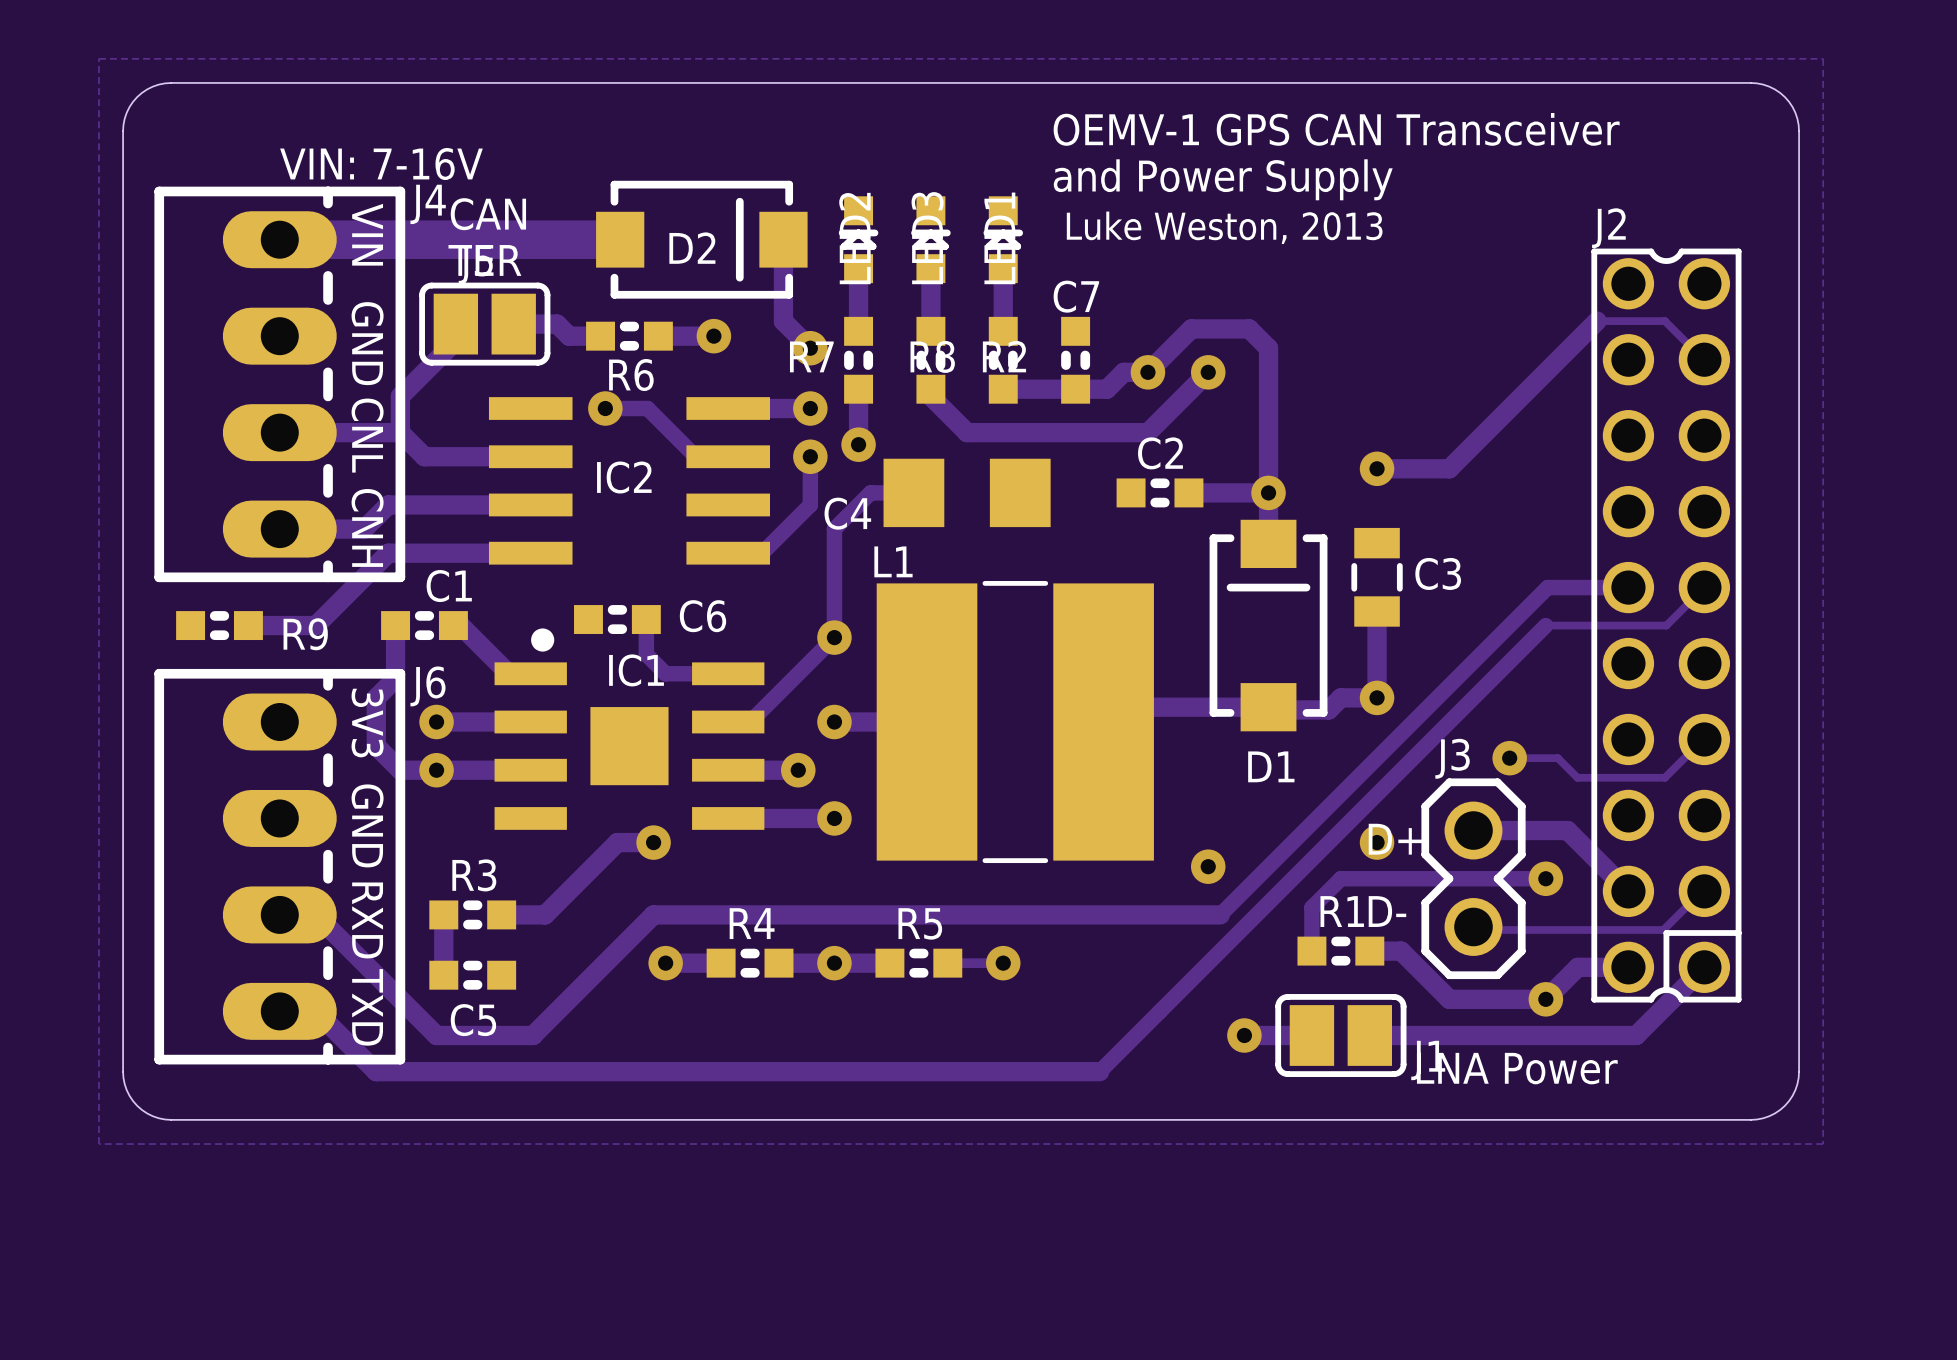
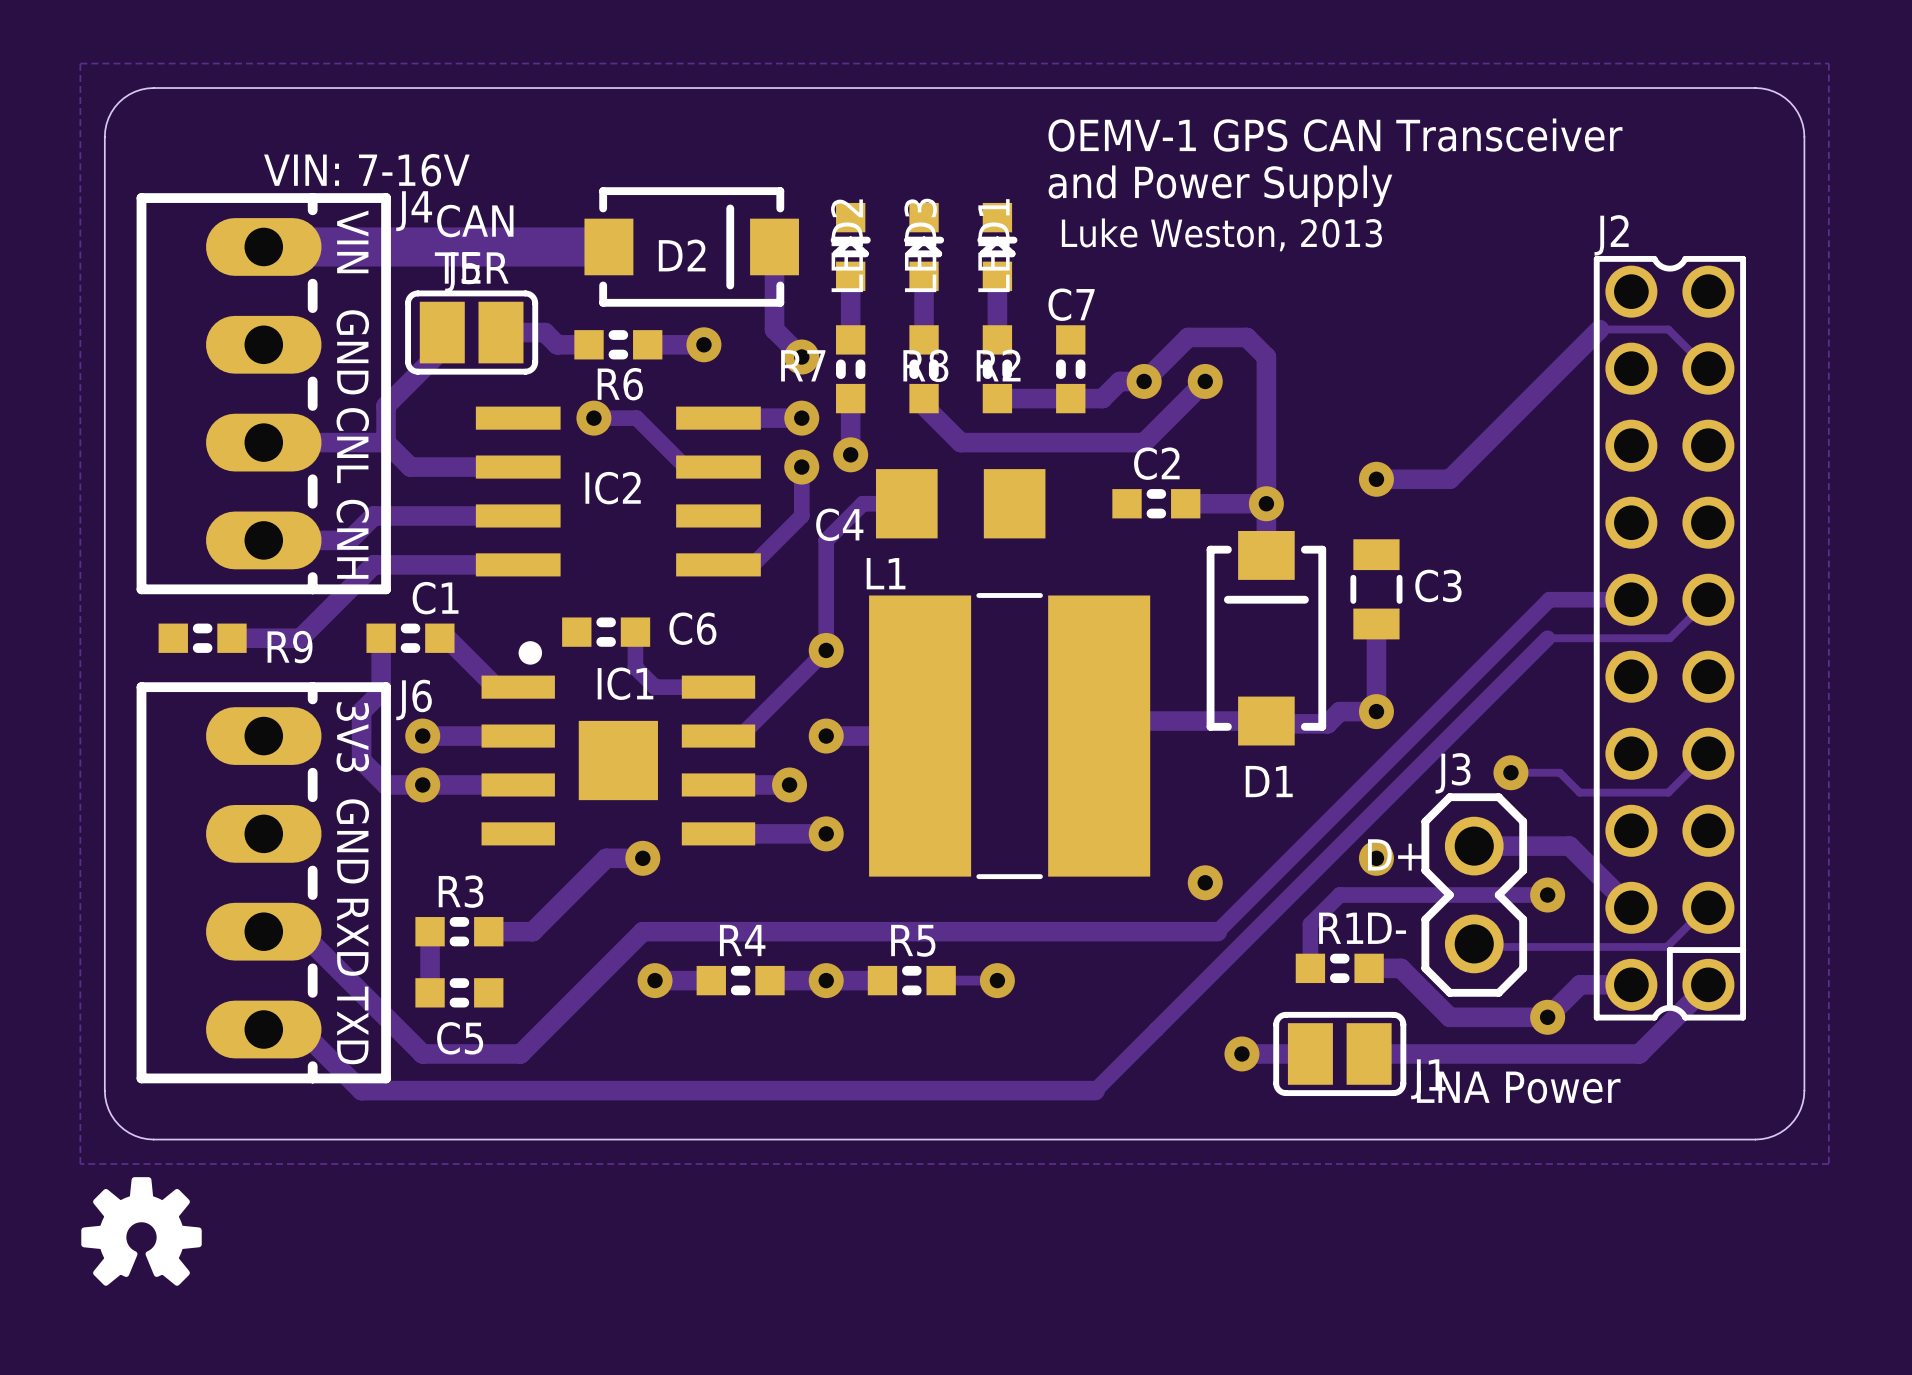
drawing: none -> [81, 1177, 202, 1286]

